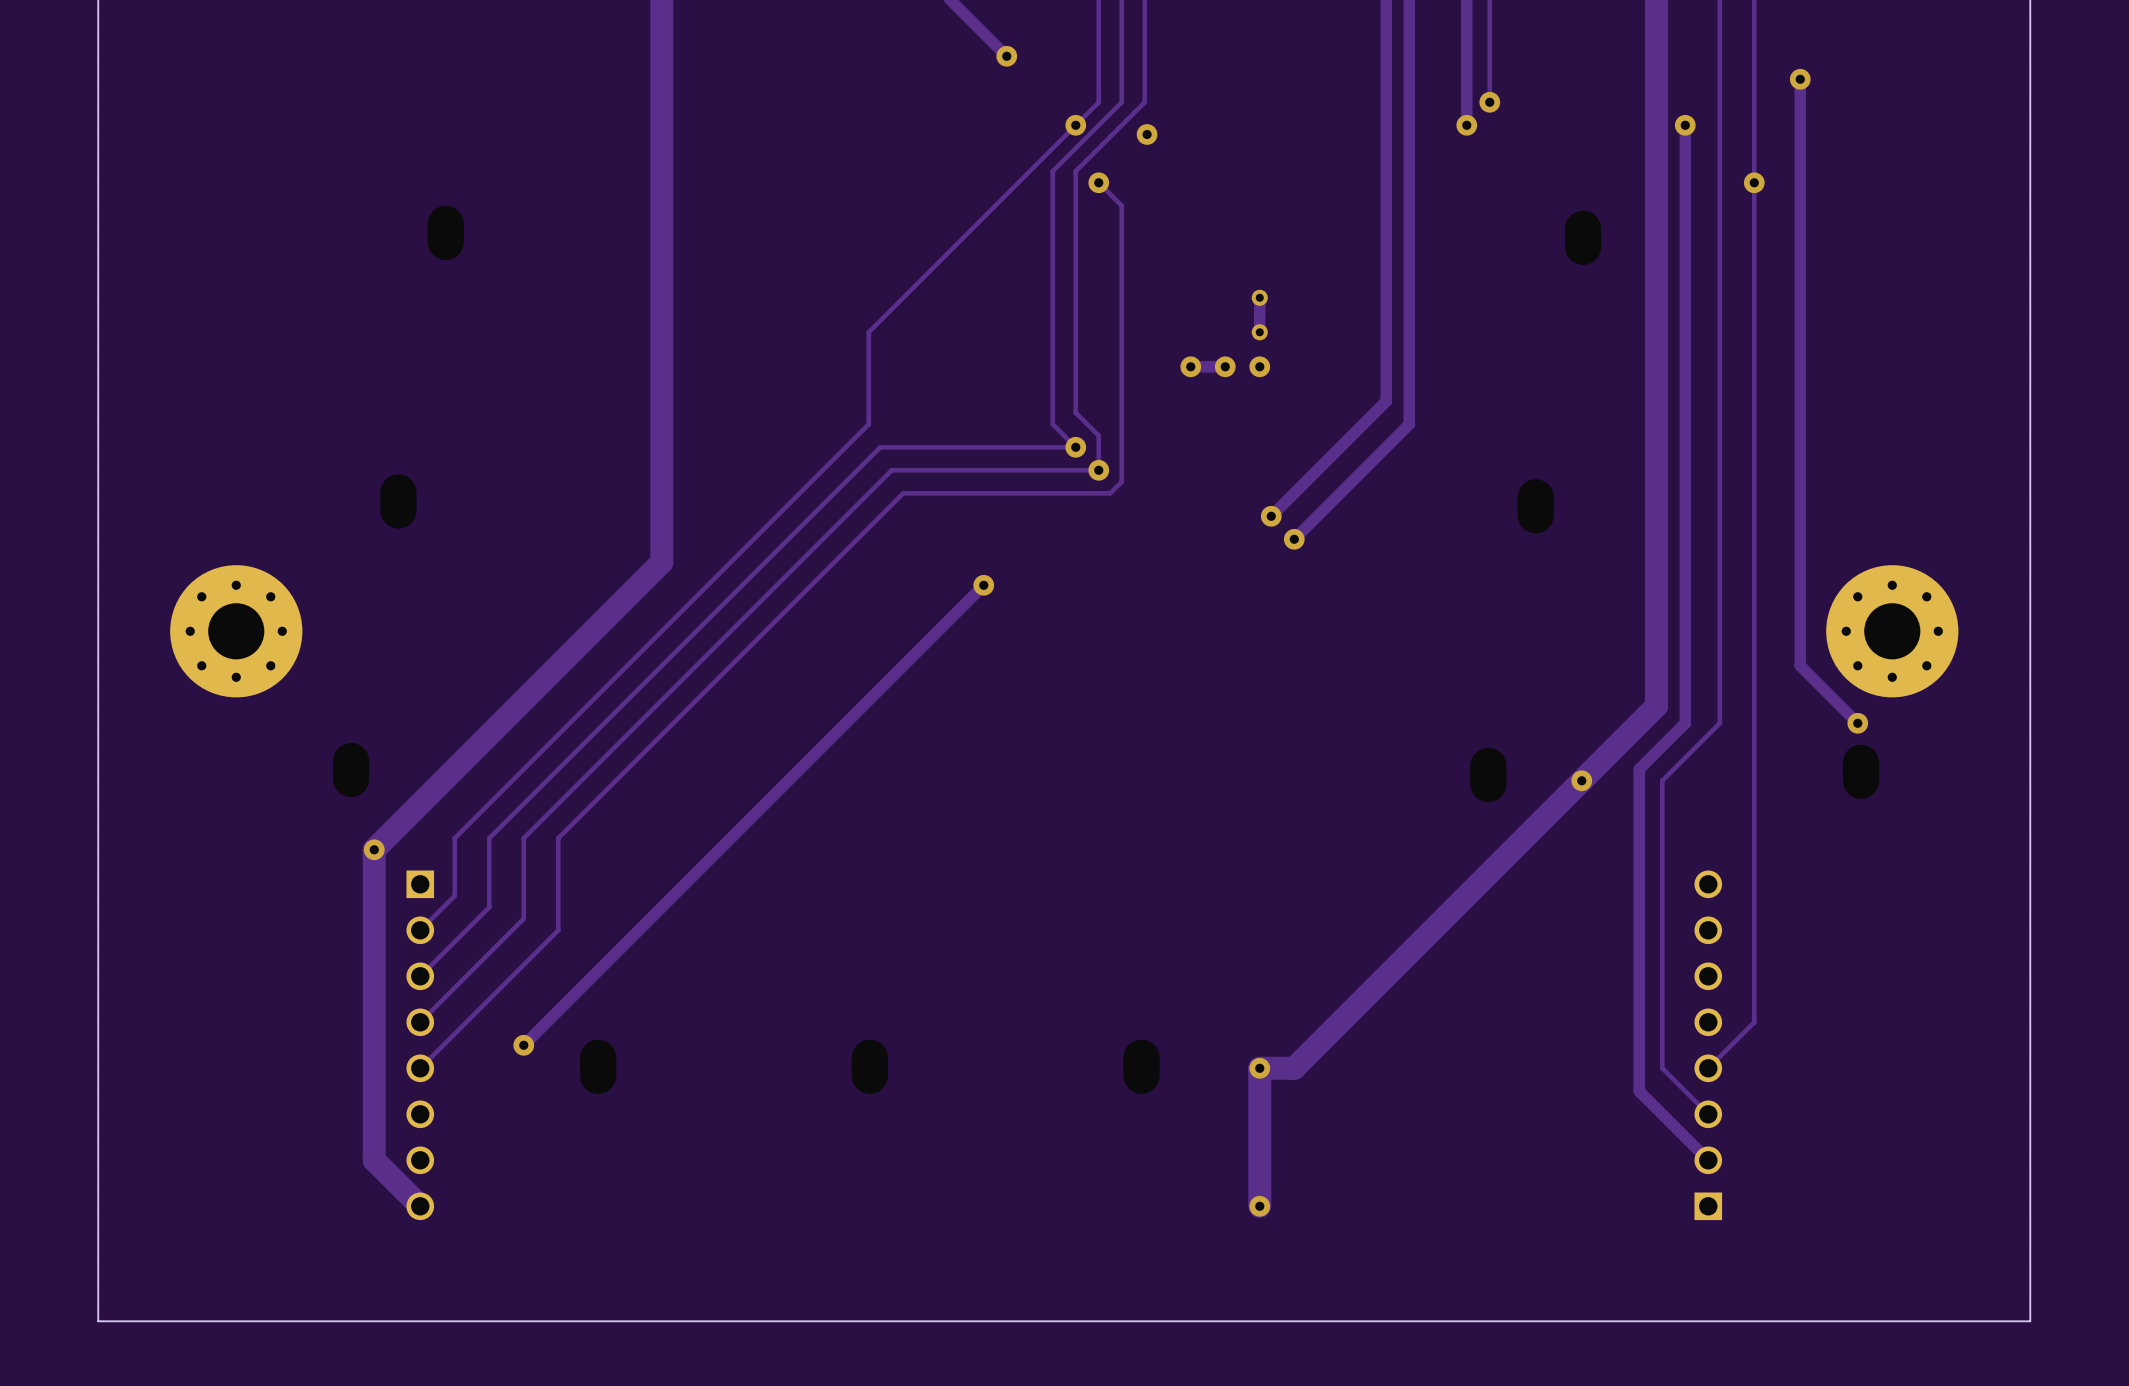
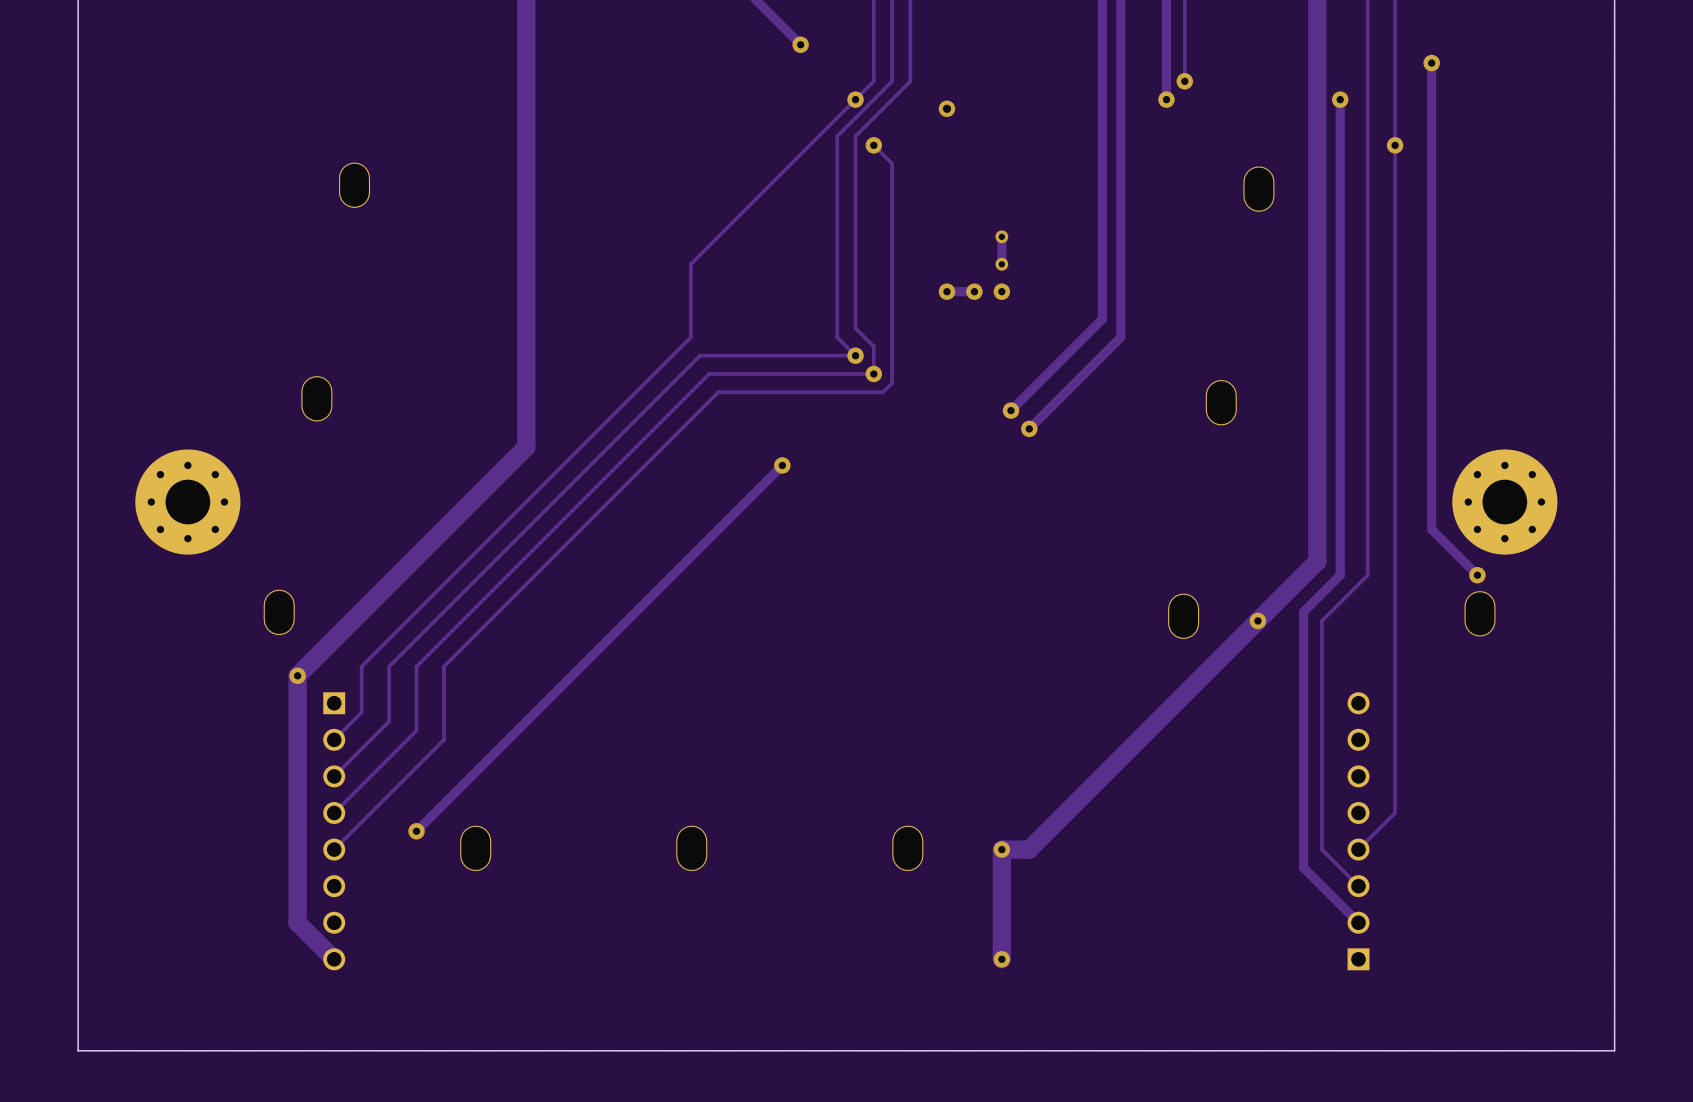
via: (1147, 134) -> none
via: none -> (946, 108)
part footprint: [427, 205, 464, 261] -> [339, 162, 371, 208]
part footprint: [1564, 210, 1602, 265] -> [1243, 166, 1275, 212]
part footprint: [380, 474, 417, 529] -> [301, 376, 333, 422]
part footprint: [1517, 479, 1554, 534] -> [1205, 379, 1237, 426]
part footprint: [332, 742, 370, 798] -> [263, 589, 295, 636]
part footprint: [1842, 744, 1880, 799] -> [1464, 591, 1496, 637]
part footprint: [1470, 747, 1507, 803] -> [1168, 593, 1200, 639]
part footprint: [580, 1039, 617, 1094] -> [460, 825, 492, 872]
part footprint: [851, 1039, 888, 1094] -> [676, 825, 708, 872]
part footprint: [1123, 1039, 1160, 1094] -> [892, 825, 924, 872]

